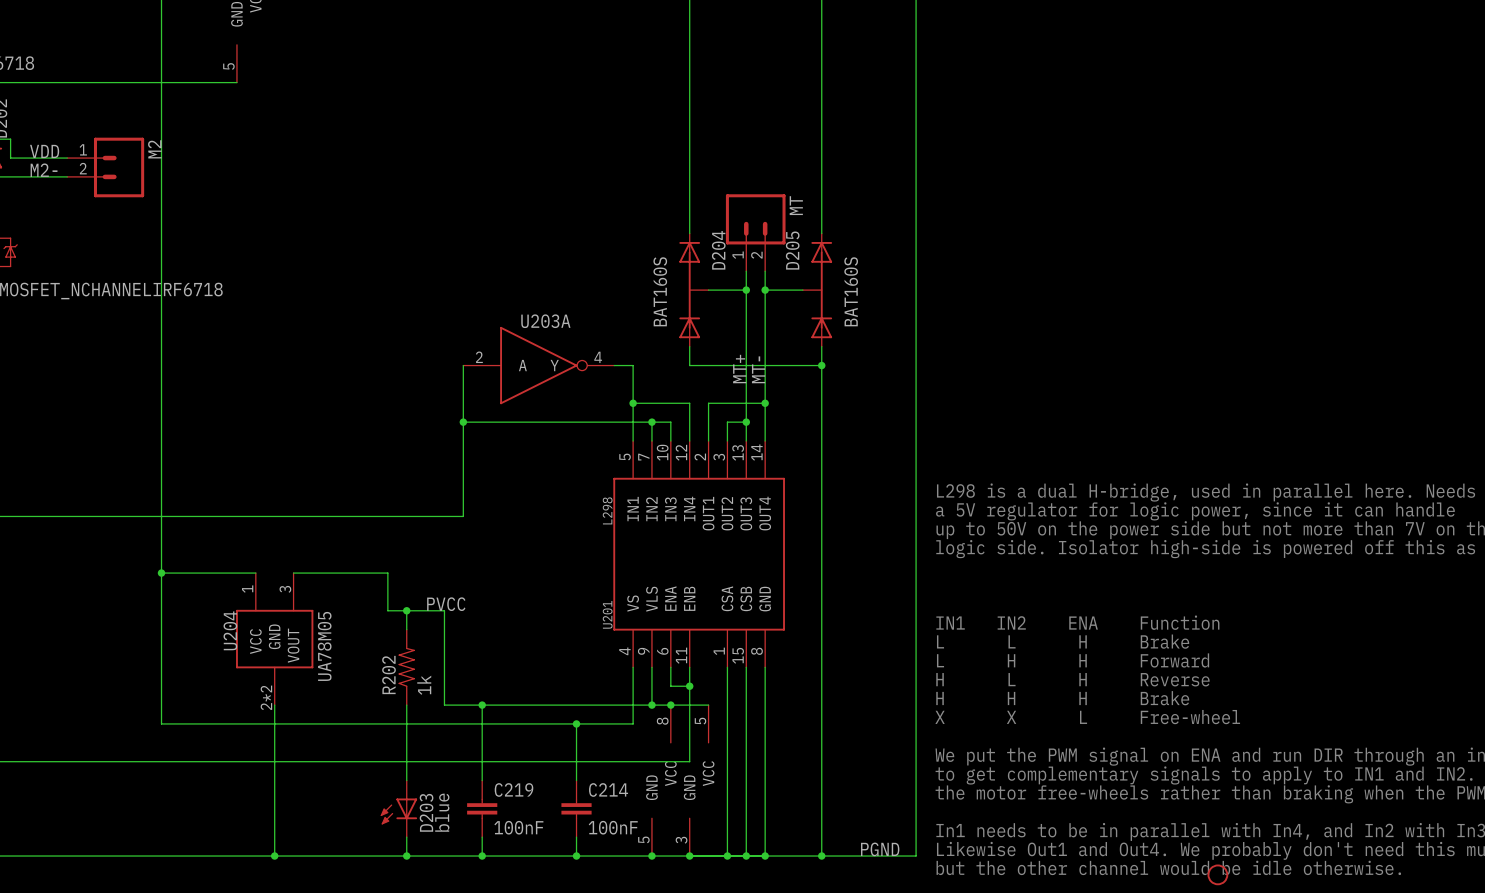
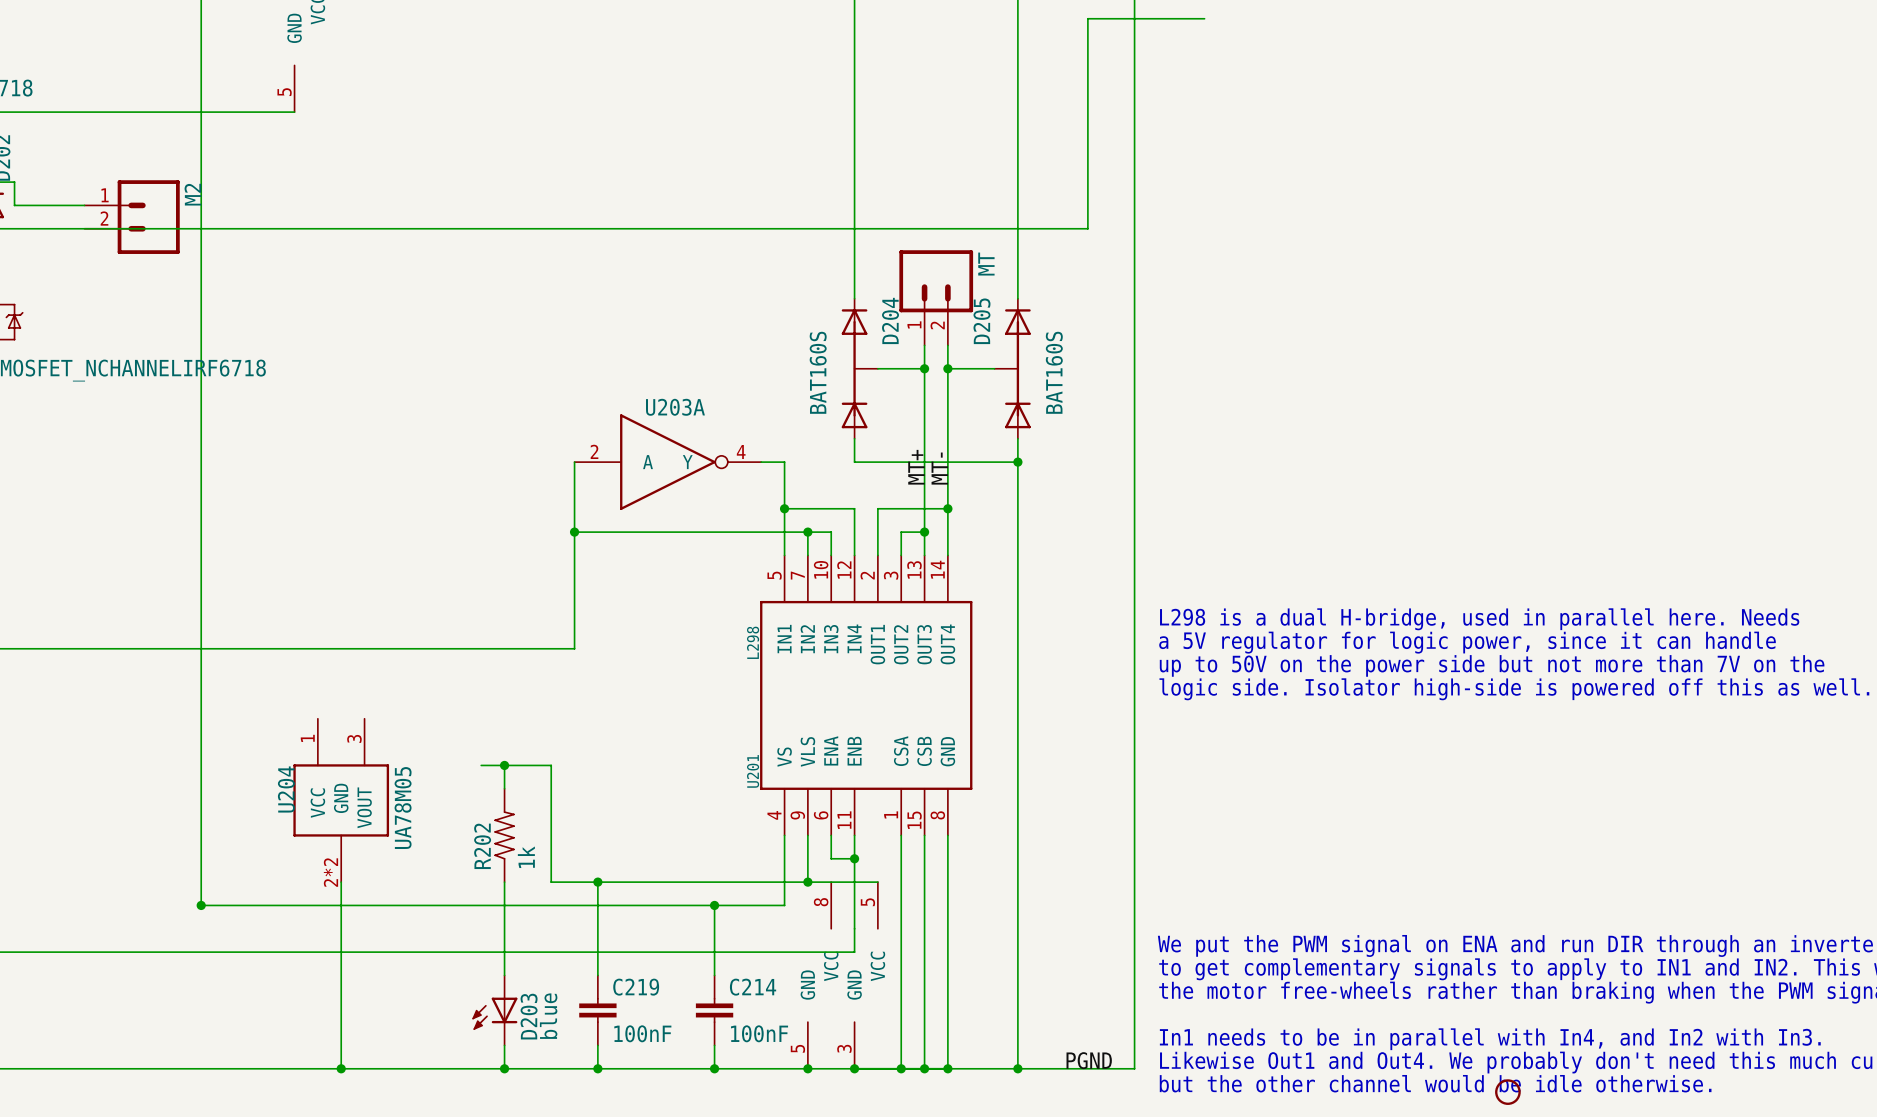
wire: none -> (1204, 18) (1087, 18) (1087, 228) (84, 228)
label: VDD (44, 151) -> none
label: M2- (44, 170) -> none
wire: (161, 573) (255, 573) -> none
junction: (161, 573) -> none
wire: (293, 573) (387, 573) (387, 610) -> none
label: PVCC (446, 604) -> none
text: IN1 IN2 ENA Function (1077, 622) -> none
text: L L H Brake (1063, 641) -> none
text: L H H Forward (1073, 660) -> none
text: H L H Reverse (1072, 679) -> none
text: H H H Brake (1062, 698) -> none
junction: (670, 705) -> none
text: X X L Free-wheel (1087, 717) -> none
junction: none -> (201, 905)

